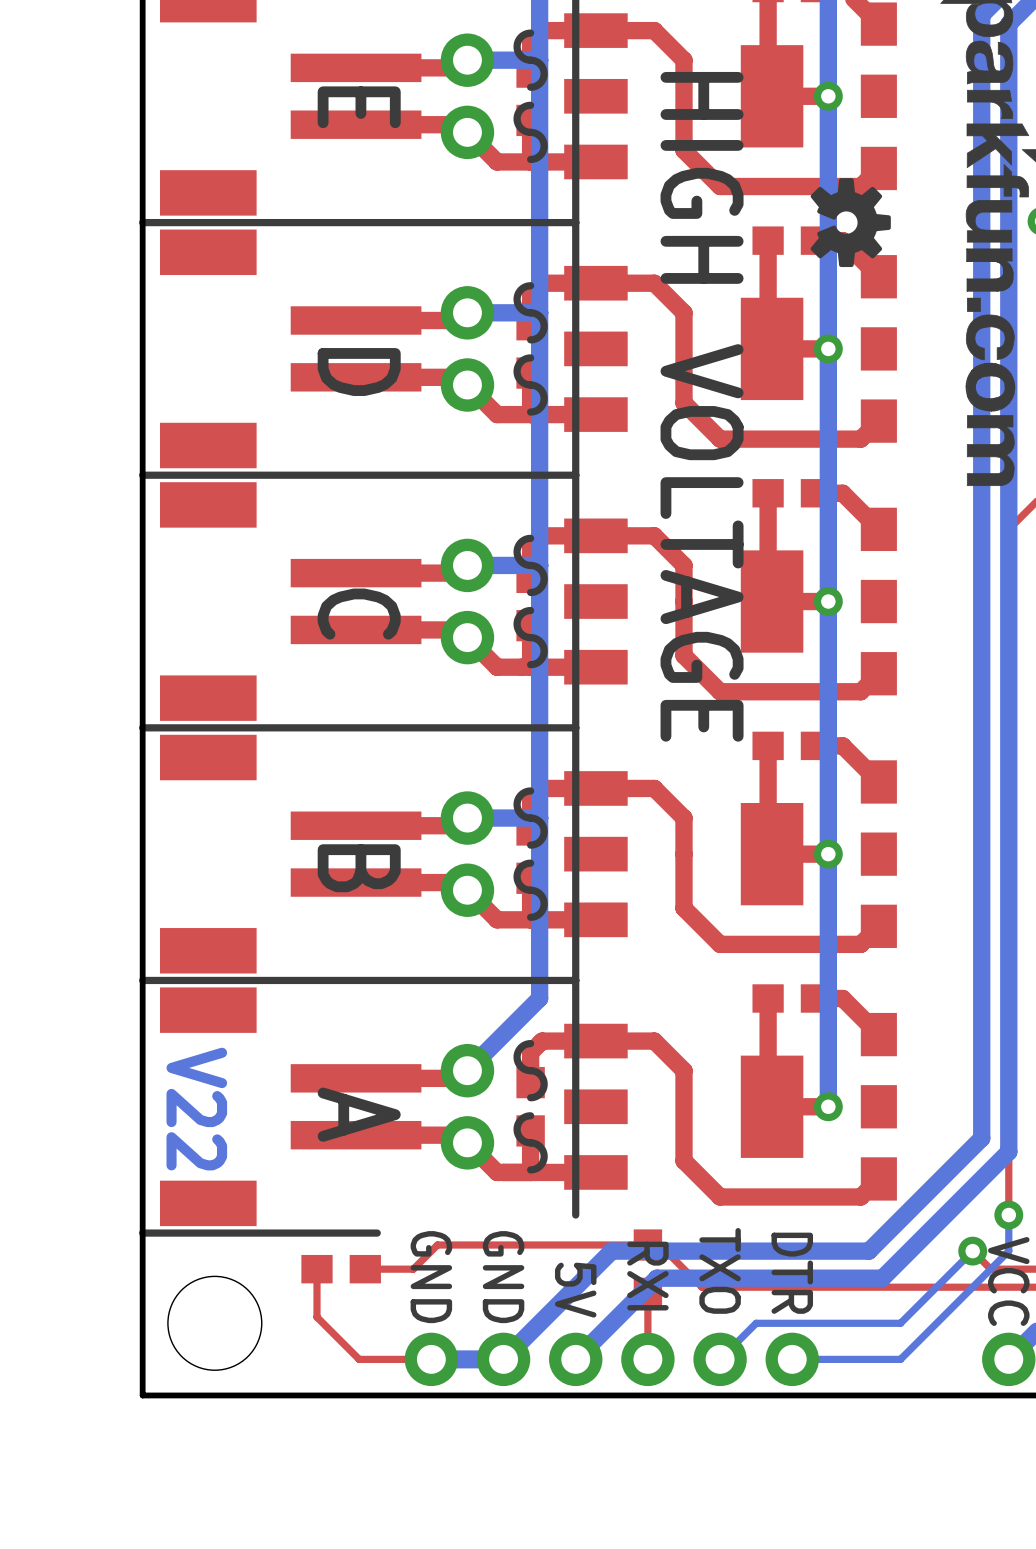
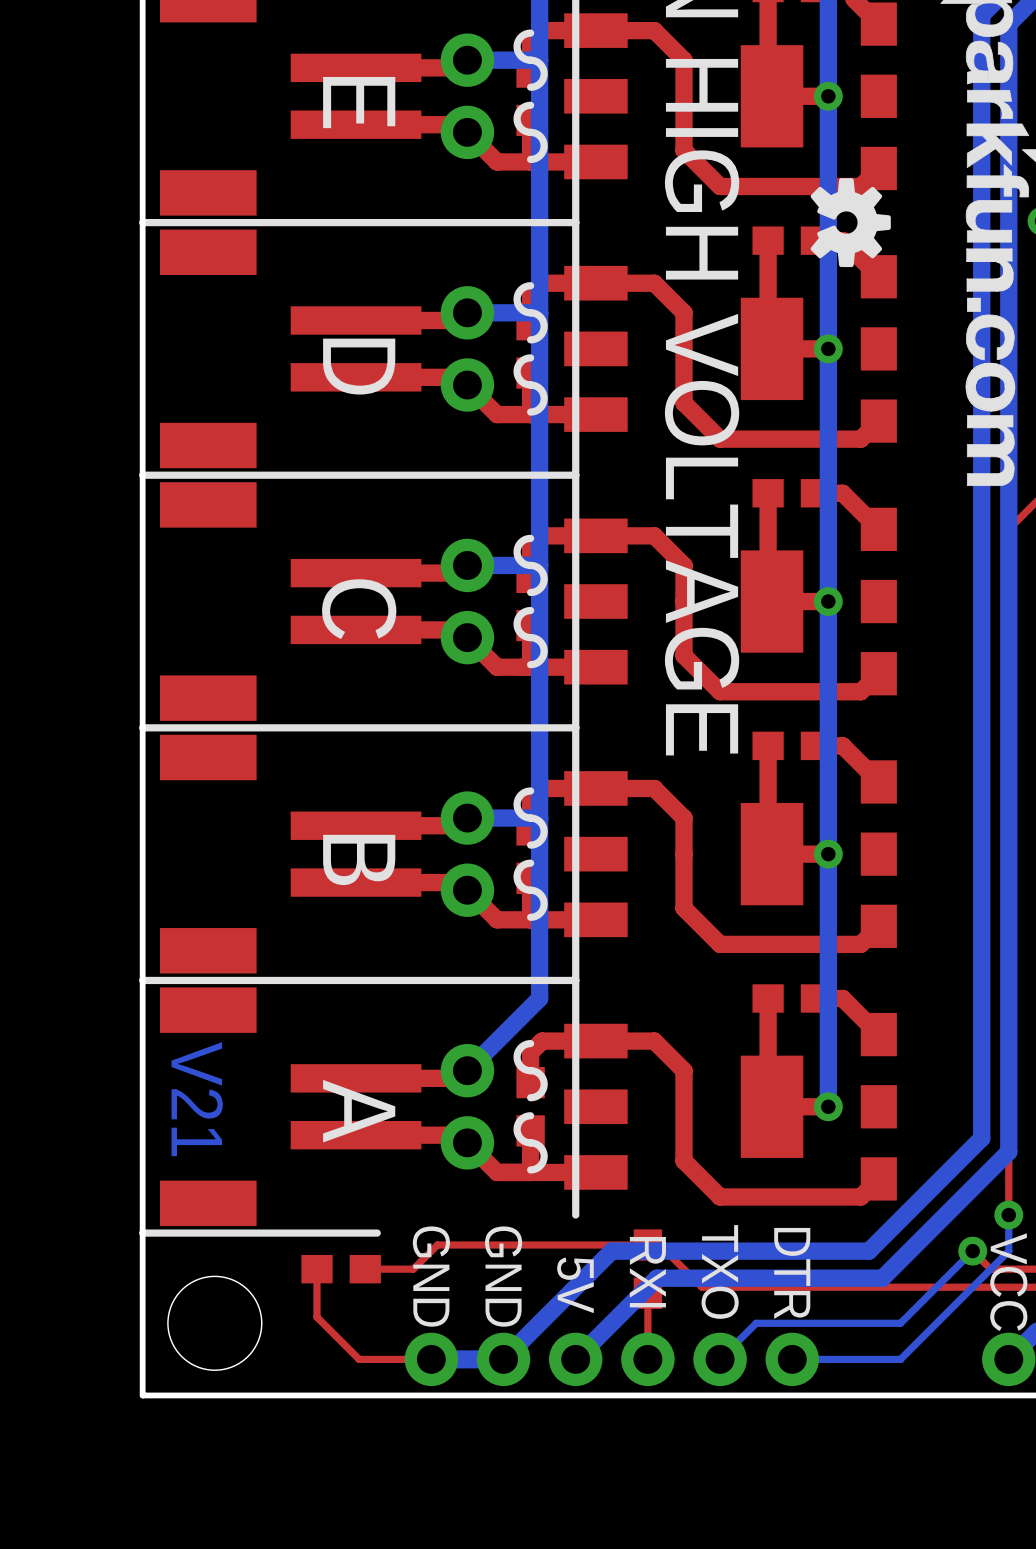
text: V22 (196, 1109) -> V21 (197, 1099)

